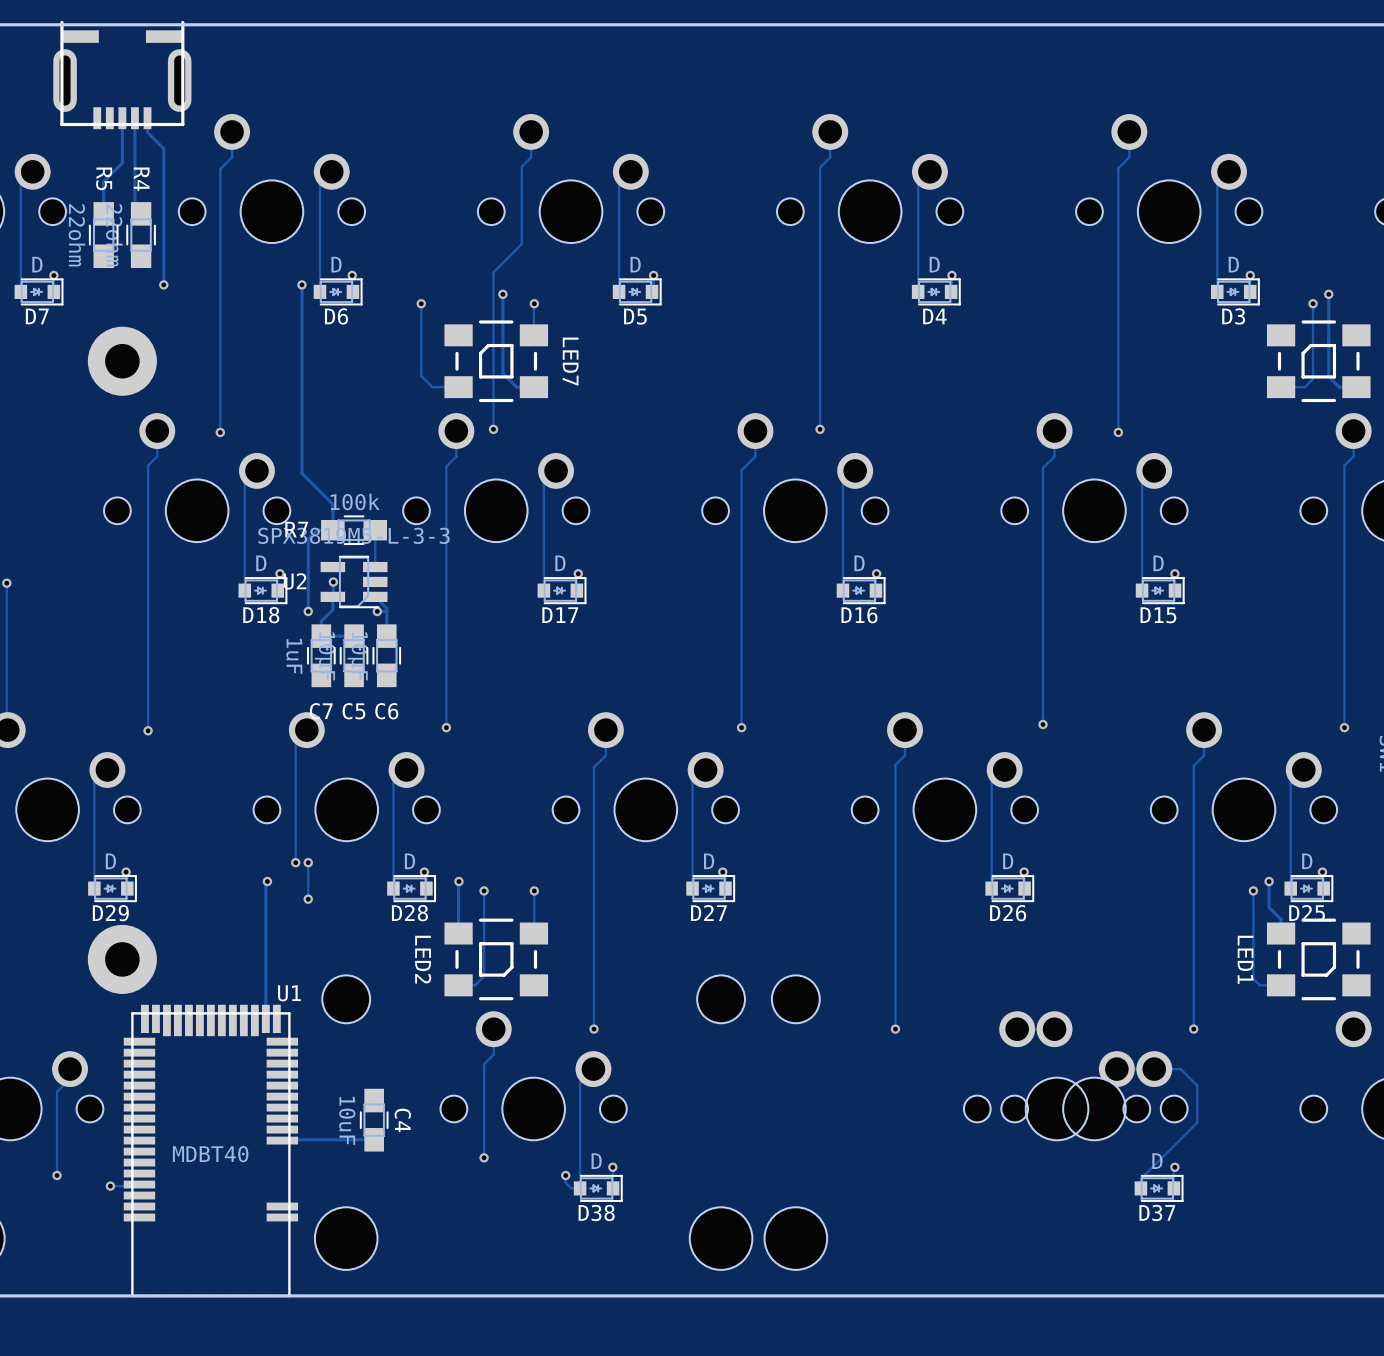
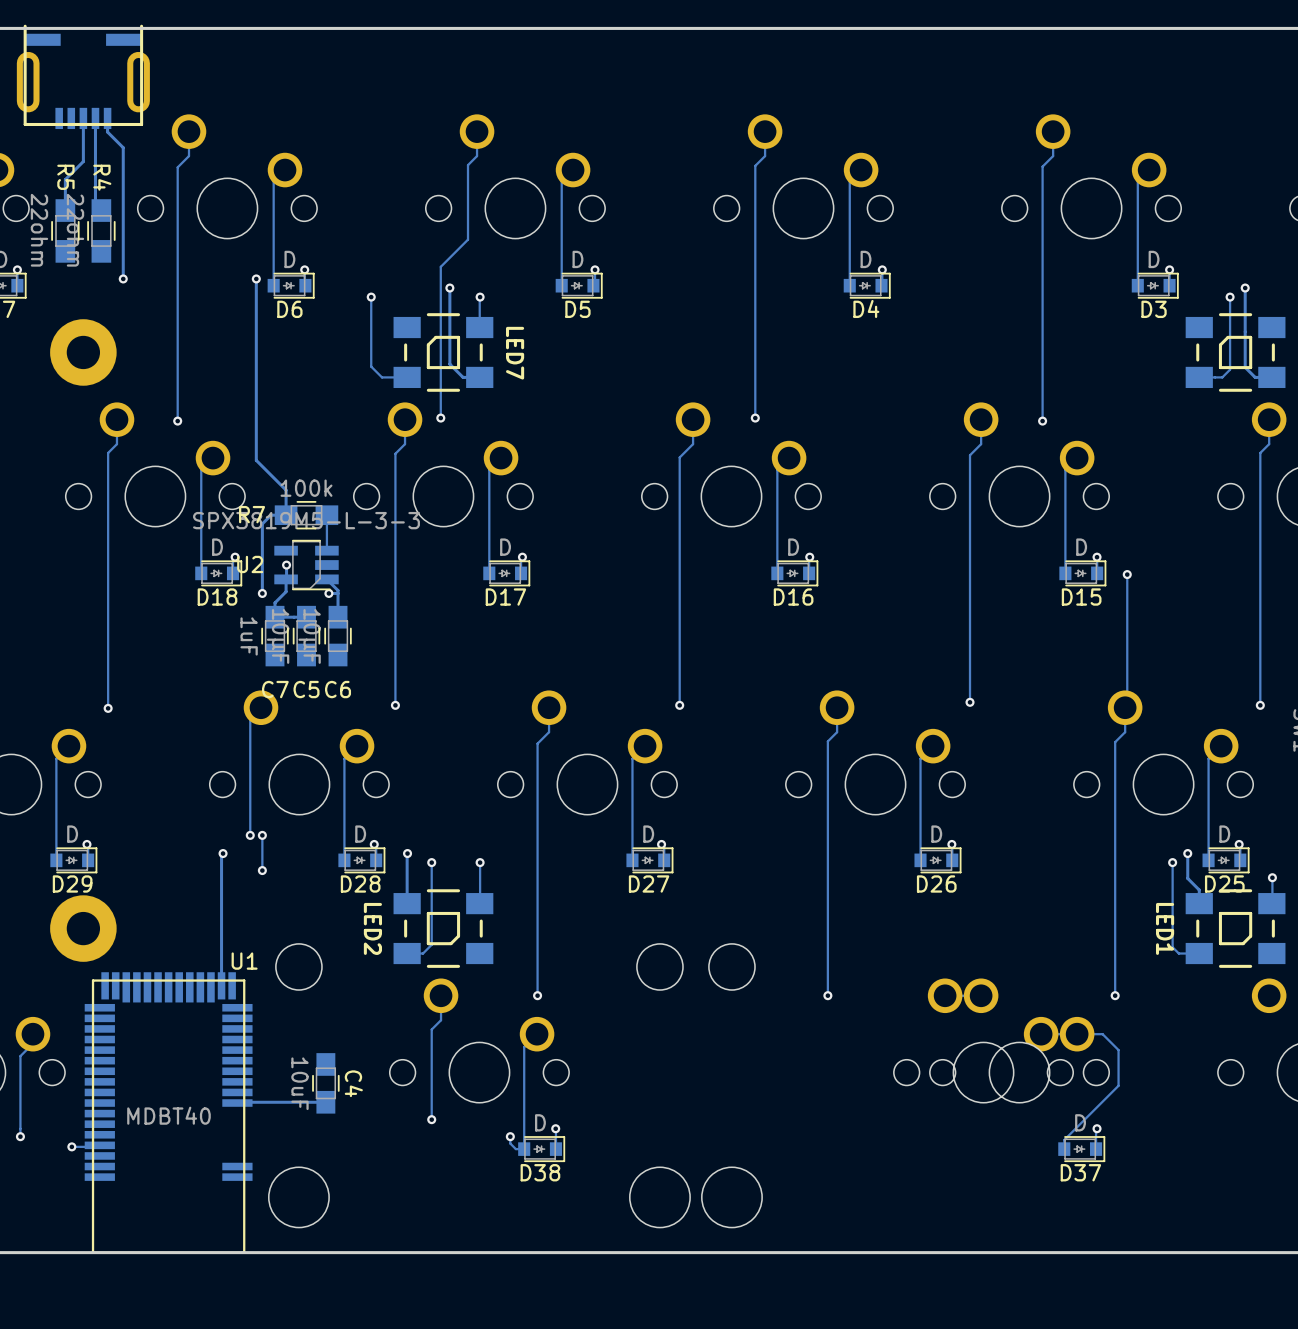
track: none -> (1127, 574) (1127, 705) (1125, 707)
via: none -> (1127, 574)
track: none -> (1272, 877) (1271, 903)
via: none -> (1272, 877)

